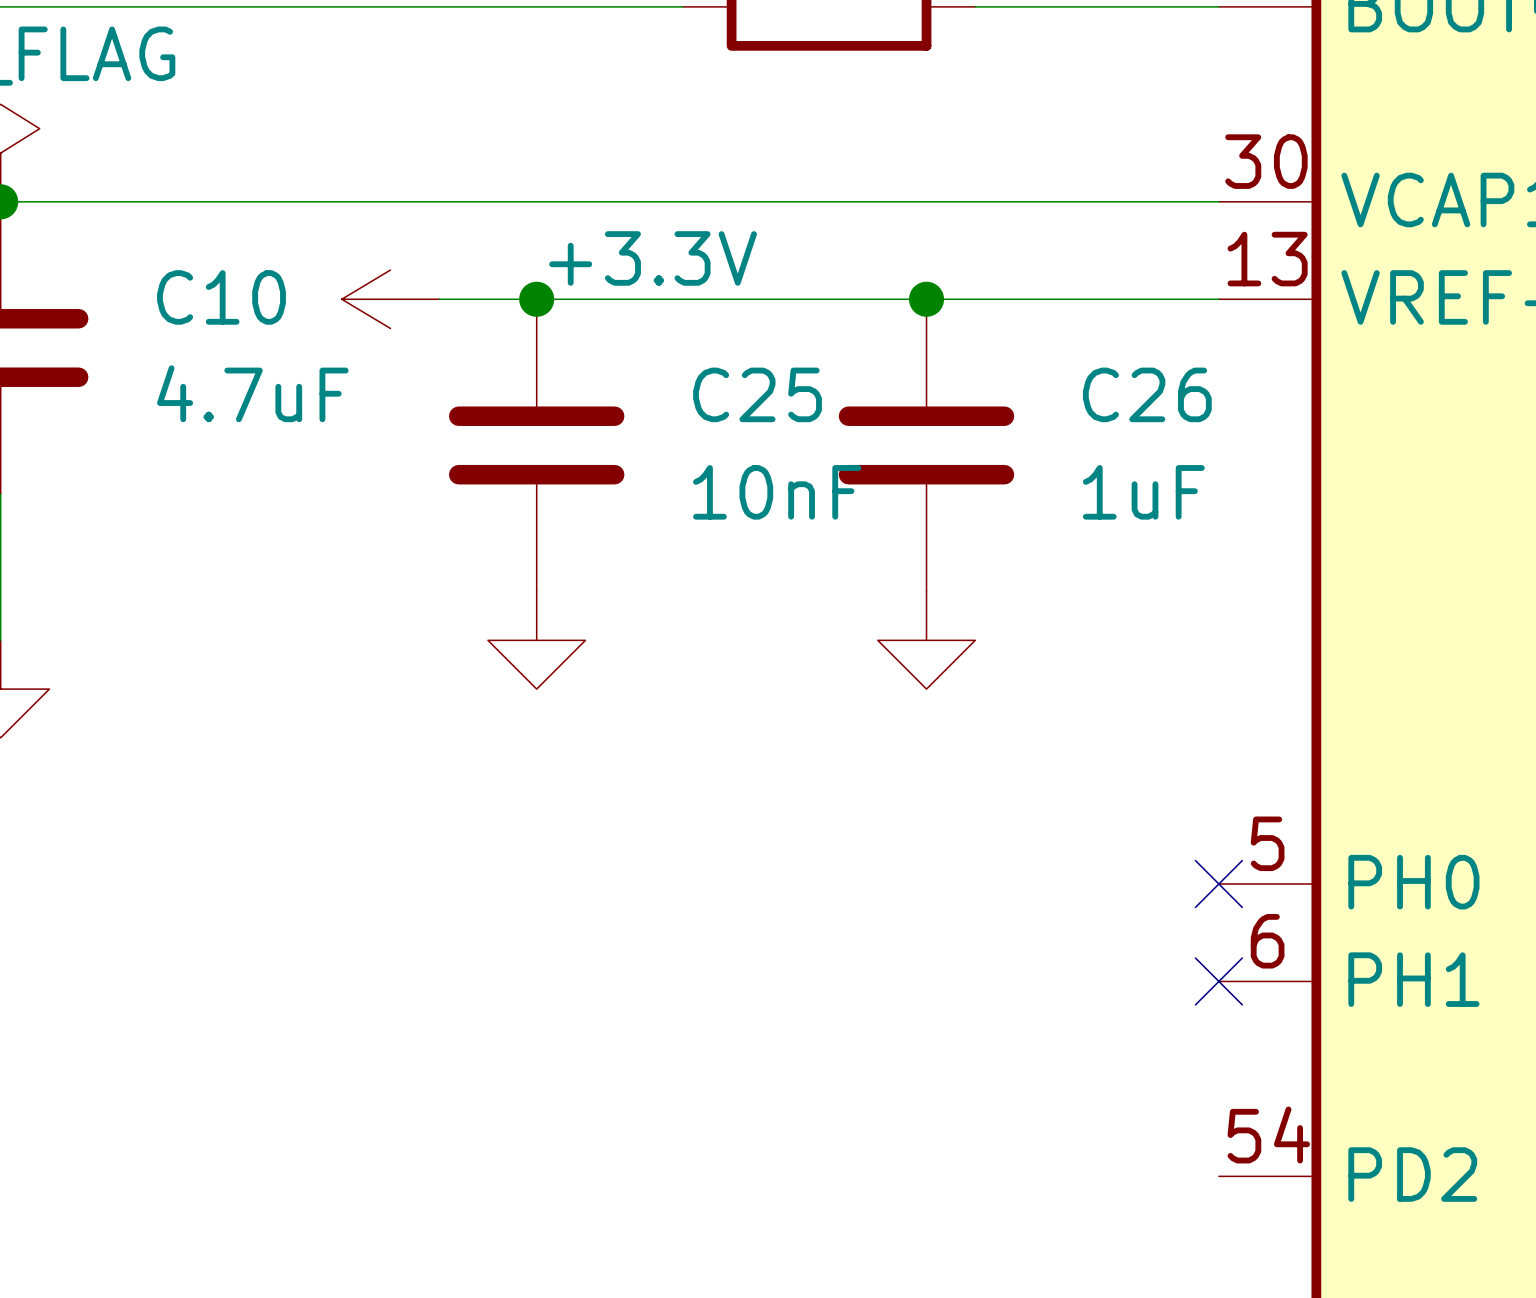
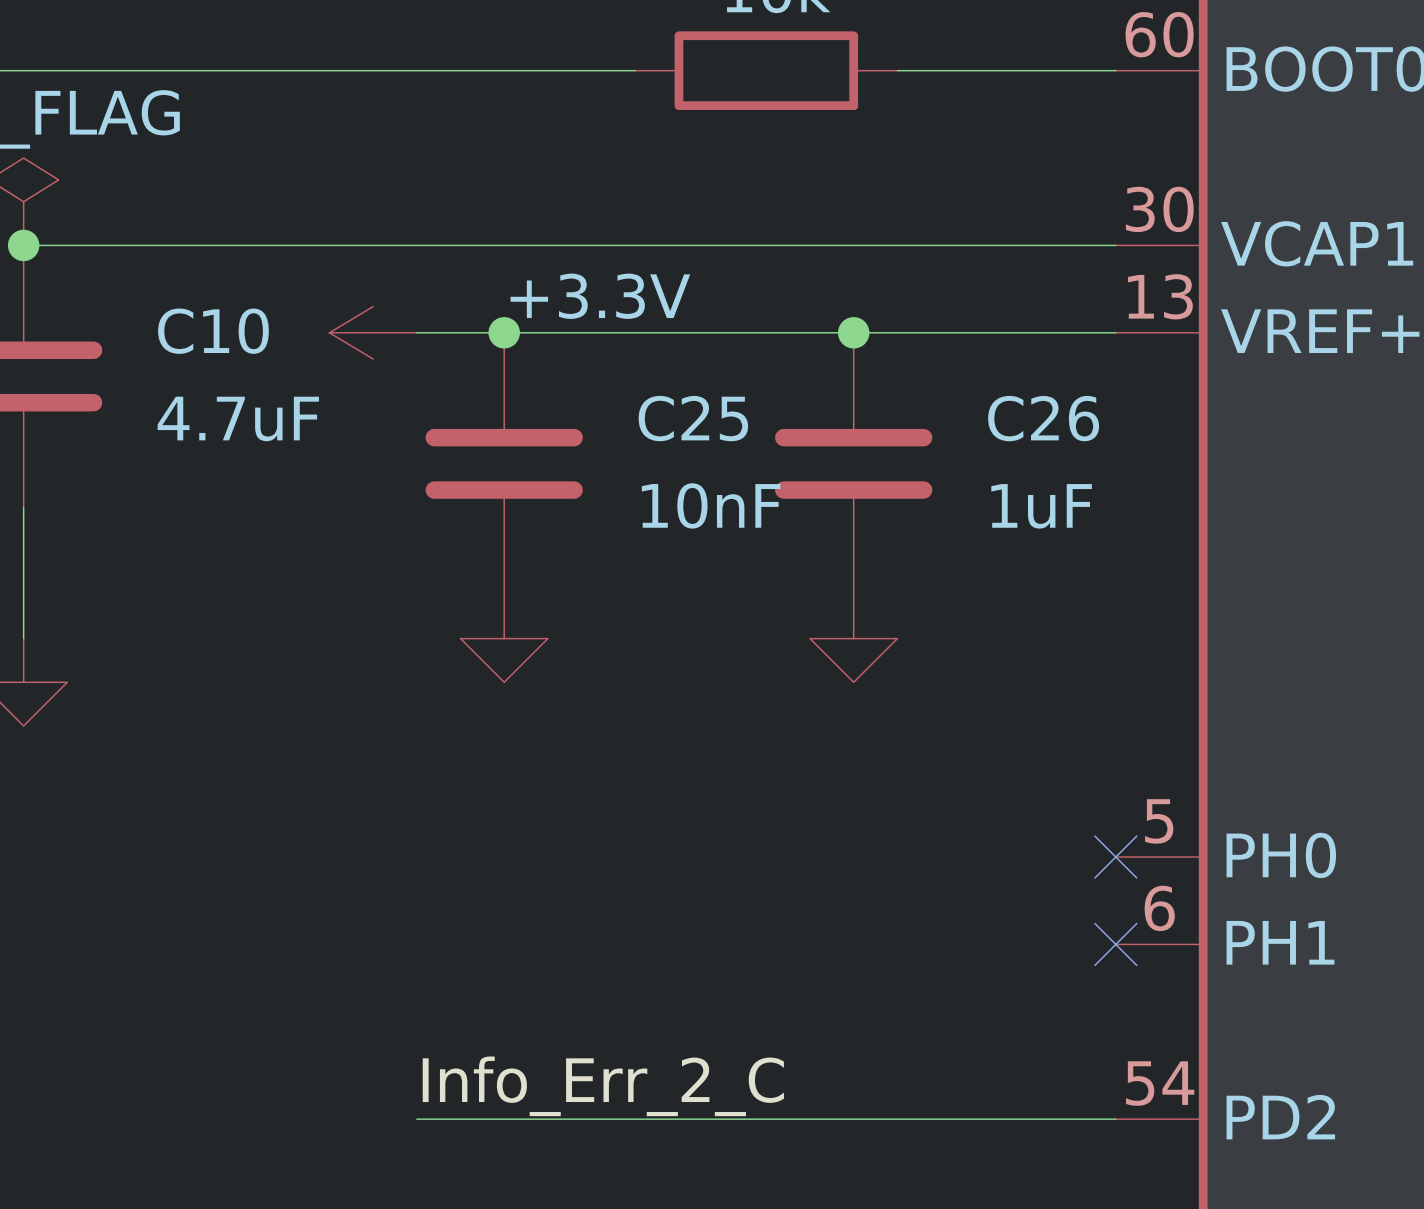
label: none -> Info_Err_2_C (603, 1086)
wire: none -> (416, 1119) (1115, 1119)

